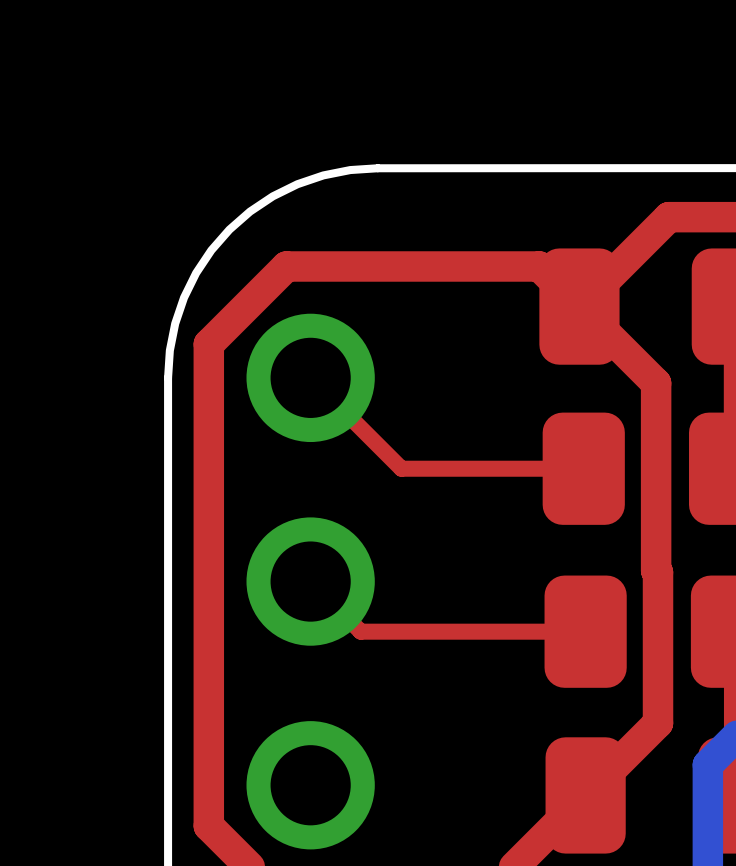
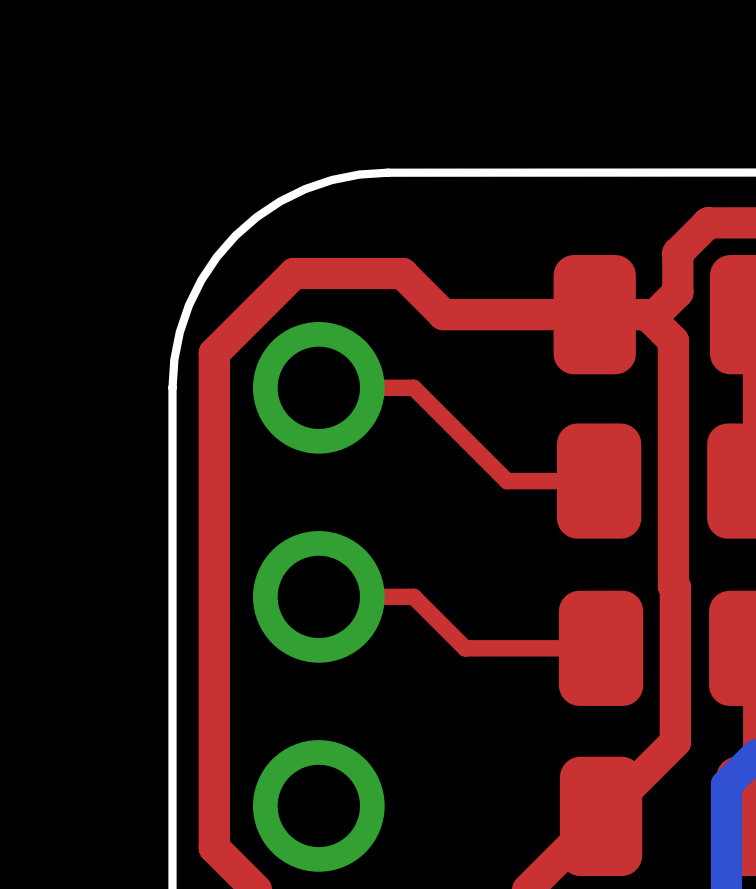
top track: (689, 217) (668, 217) (579, 306) -> none
top track: (392, 266) (539, 266) (656, 383) -> (402, 273) (443, 314) (655, 314) (677, 292) (677, 253) (708, 222)
top track: none -> (647, 314) (673, 341) (673, 393)
top track: (310, 377) (401, 468) (493, 468) -> (318, 387) (413, 387) (506, 481)
top track: (310, 581) (360, 631) (453, 631) -> (318, 596) (413, 596) (465, 648)

